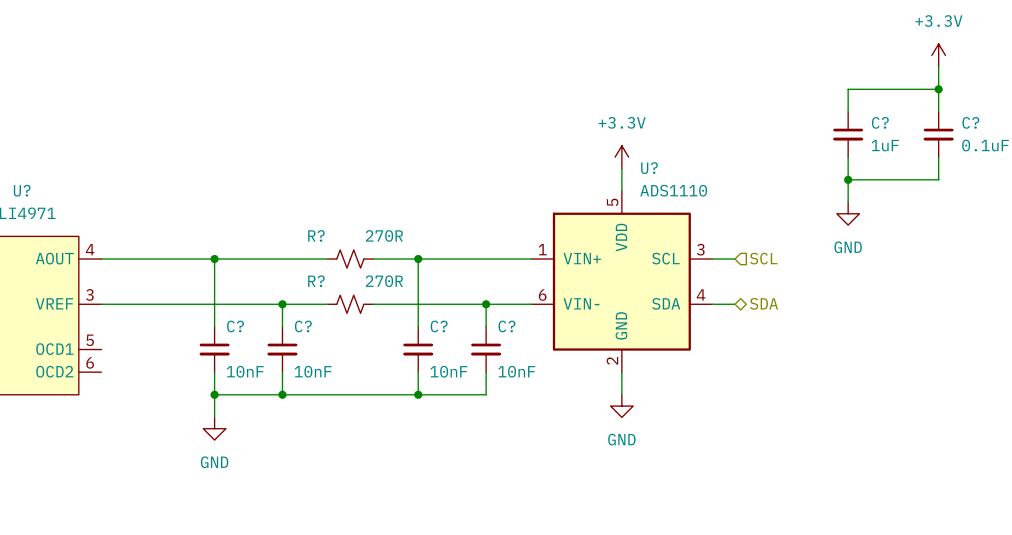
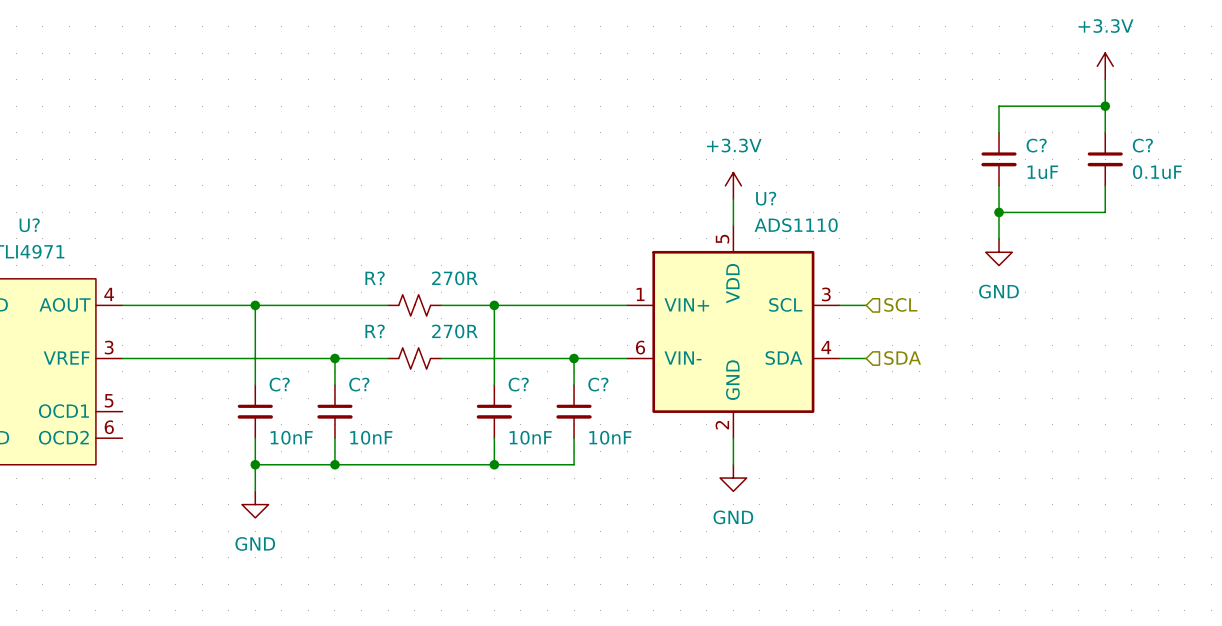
hierarchical label shape: bidirectional (764, 303) -> input (902, 358)

